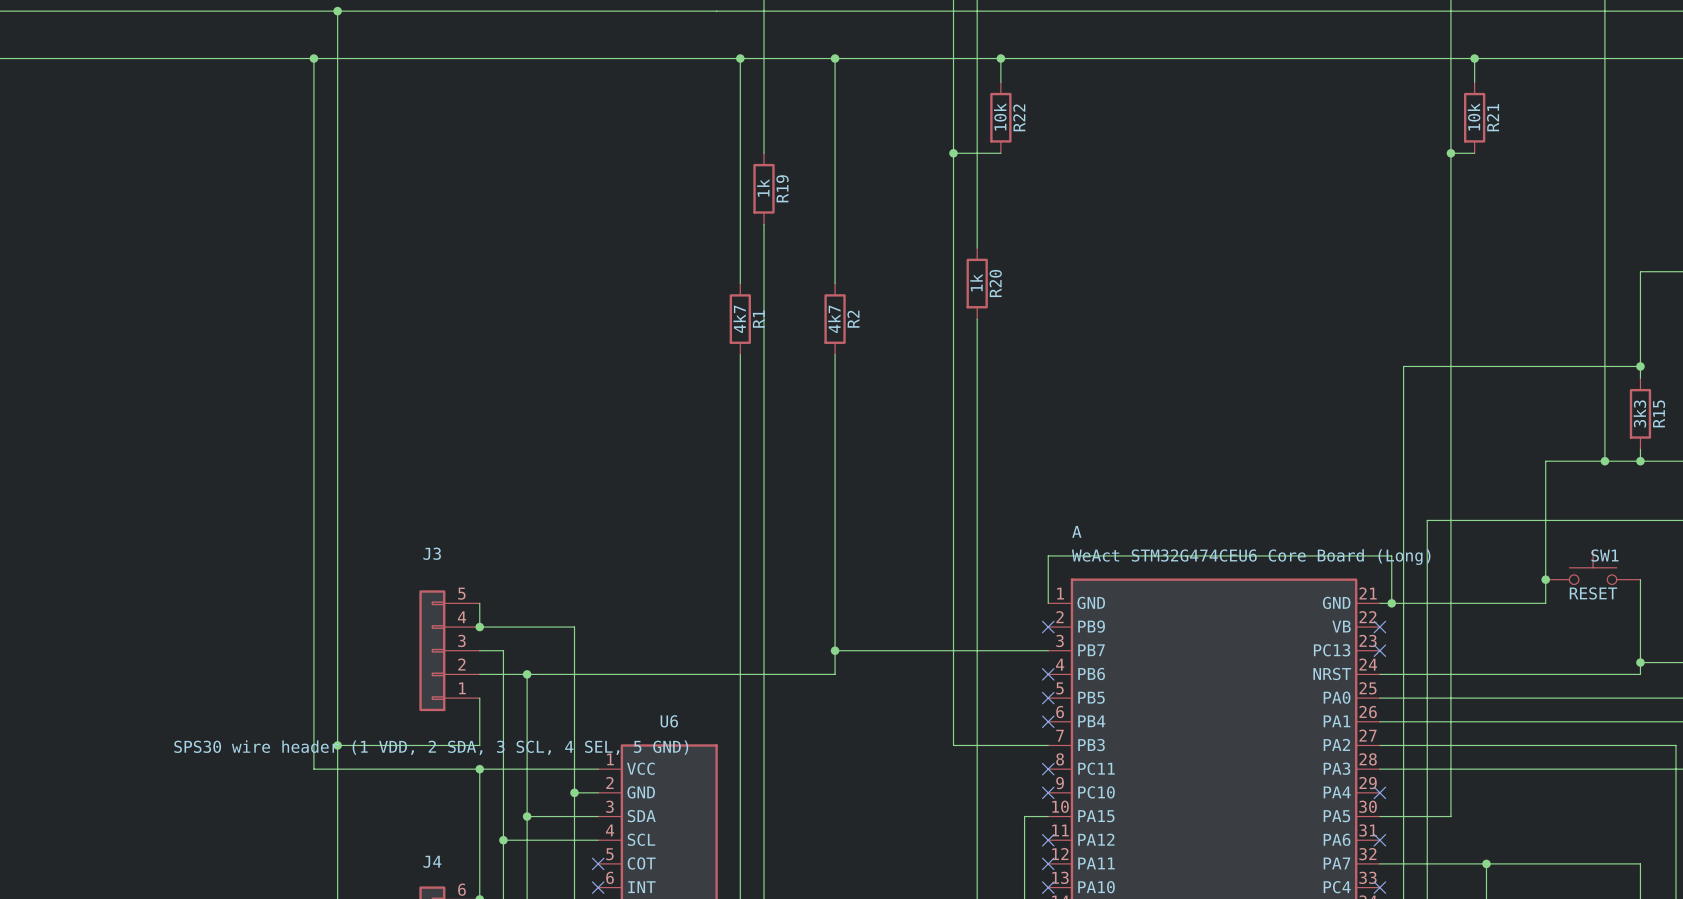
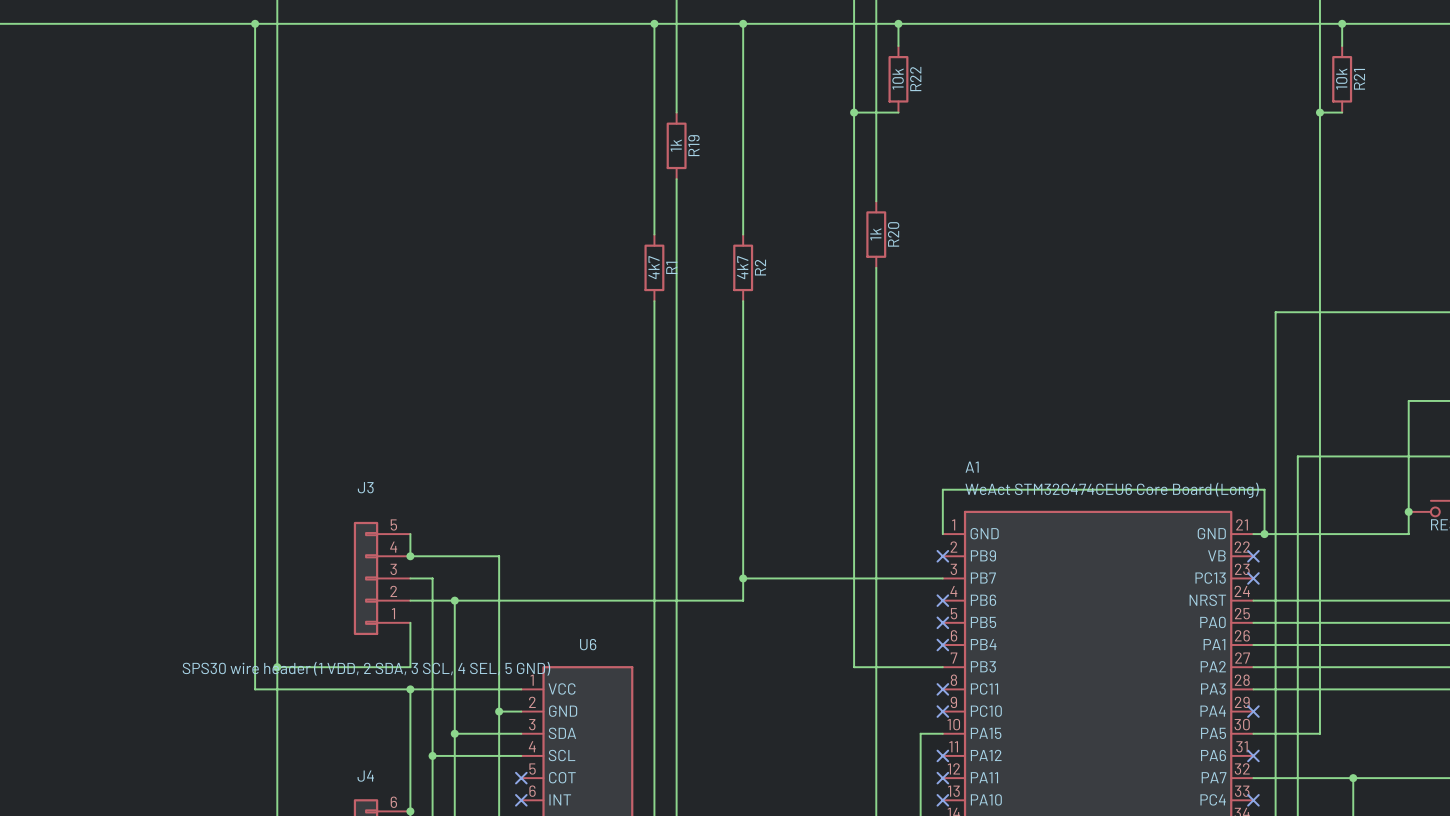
A name: A (1076, 531) -> A1 (972, 467)

